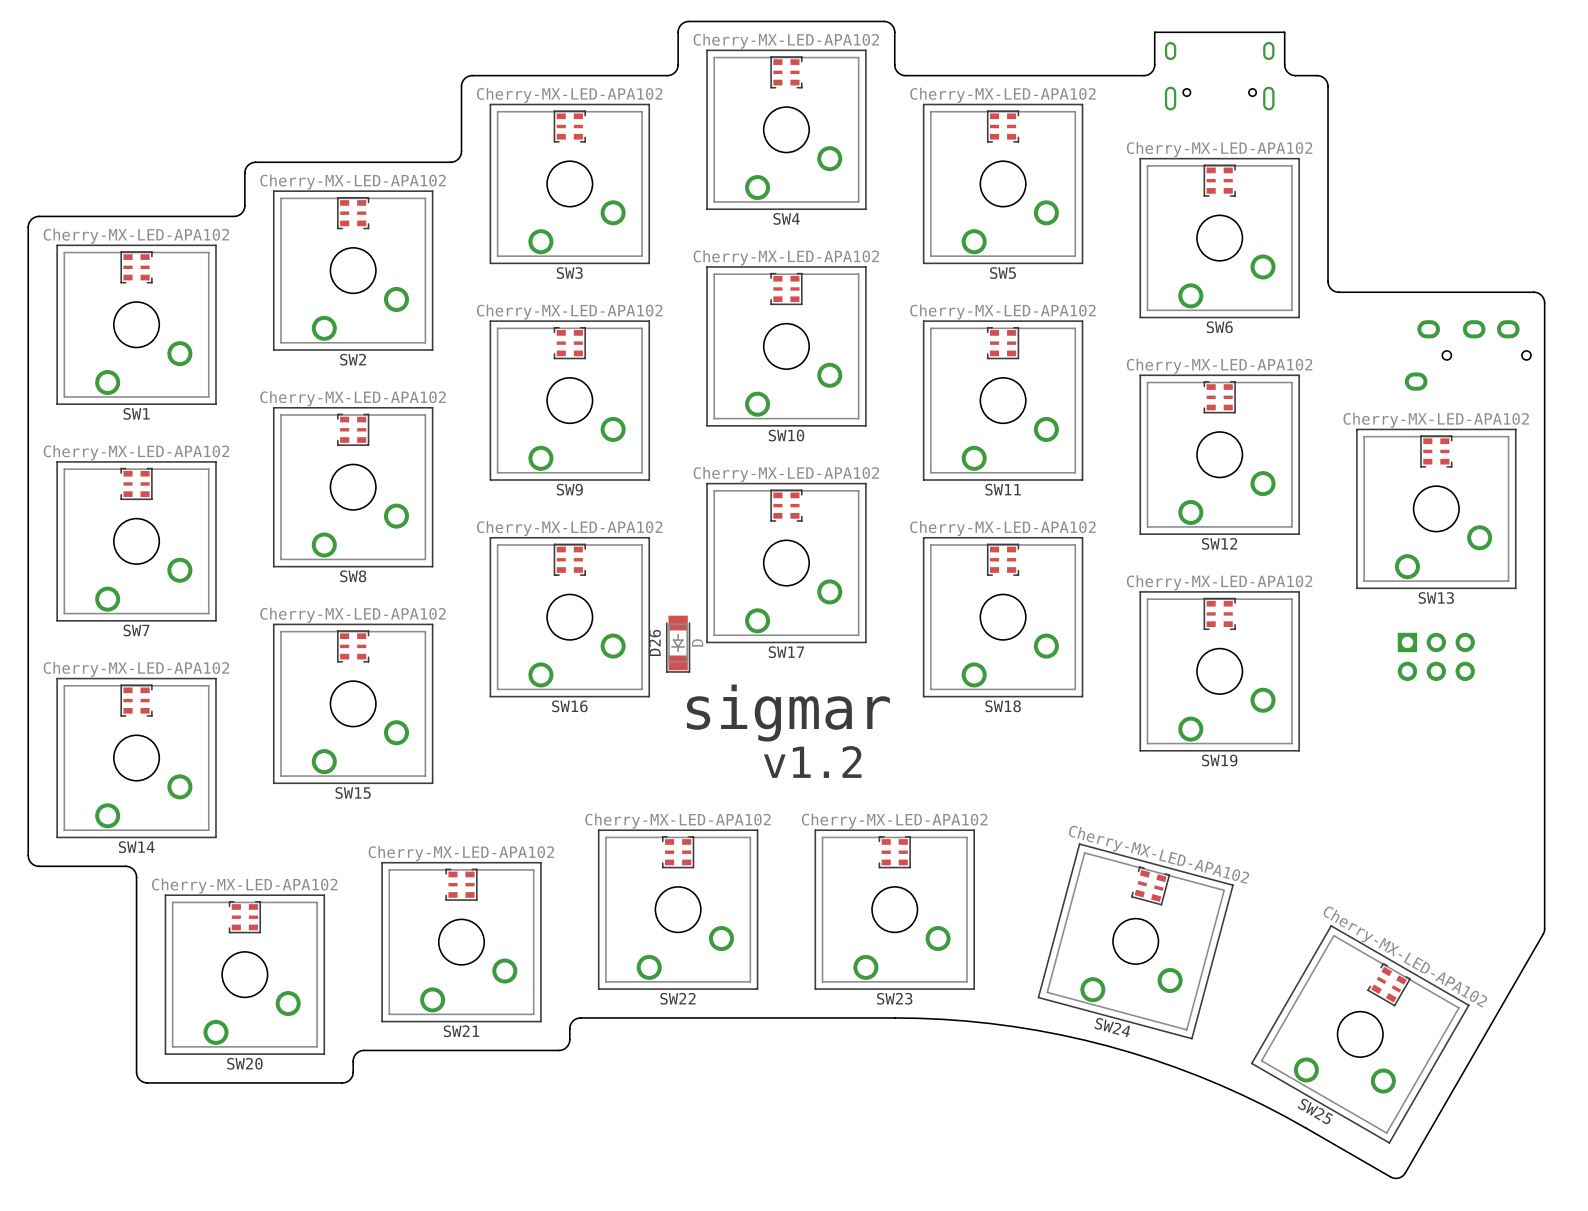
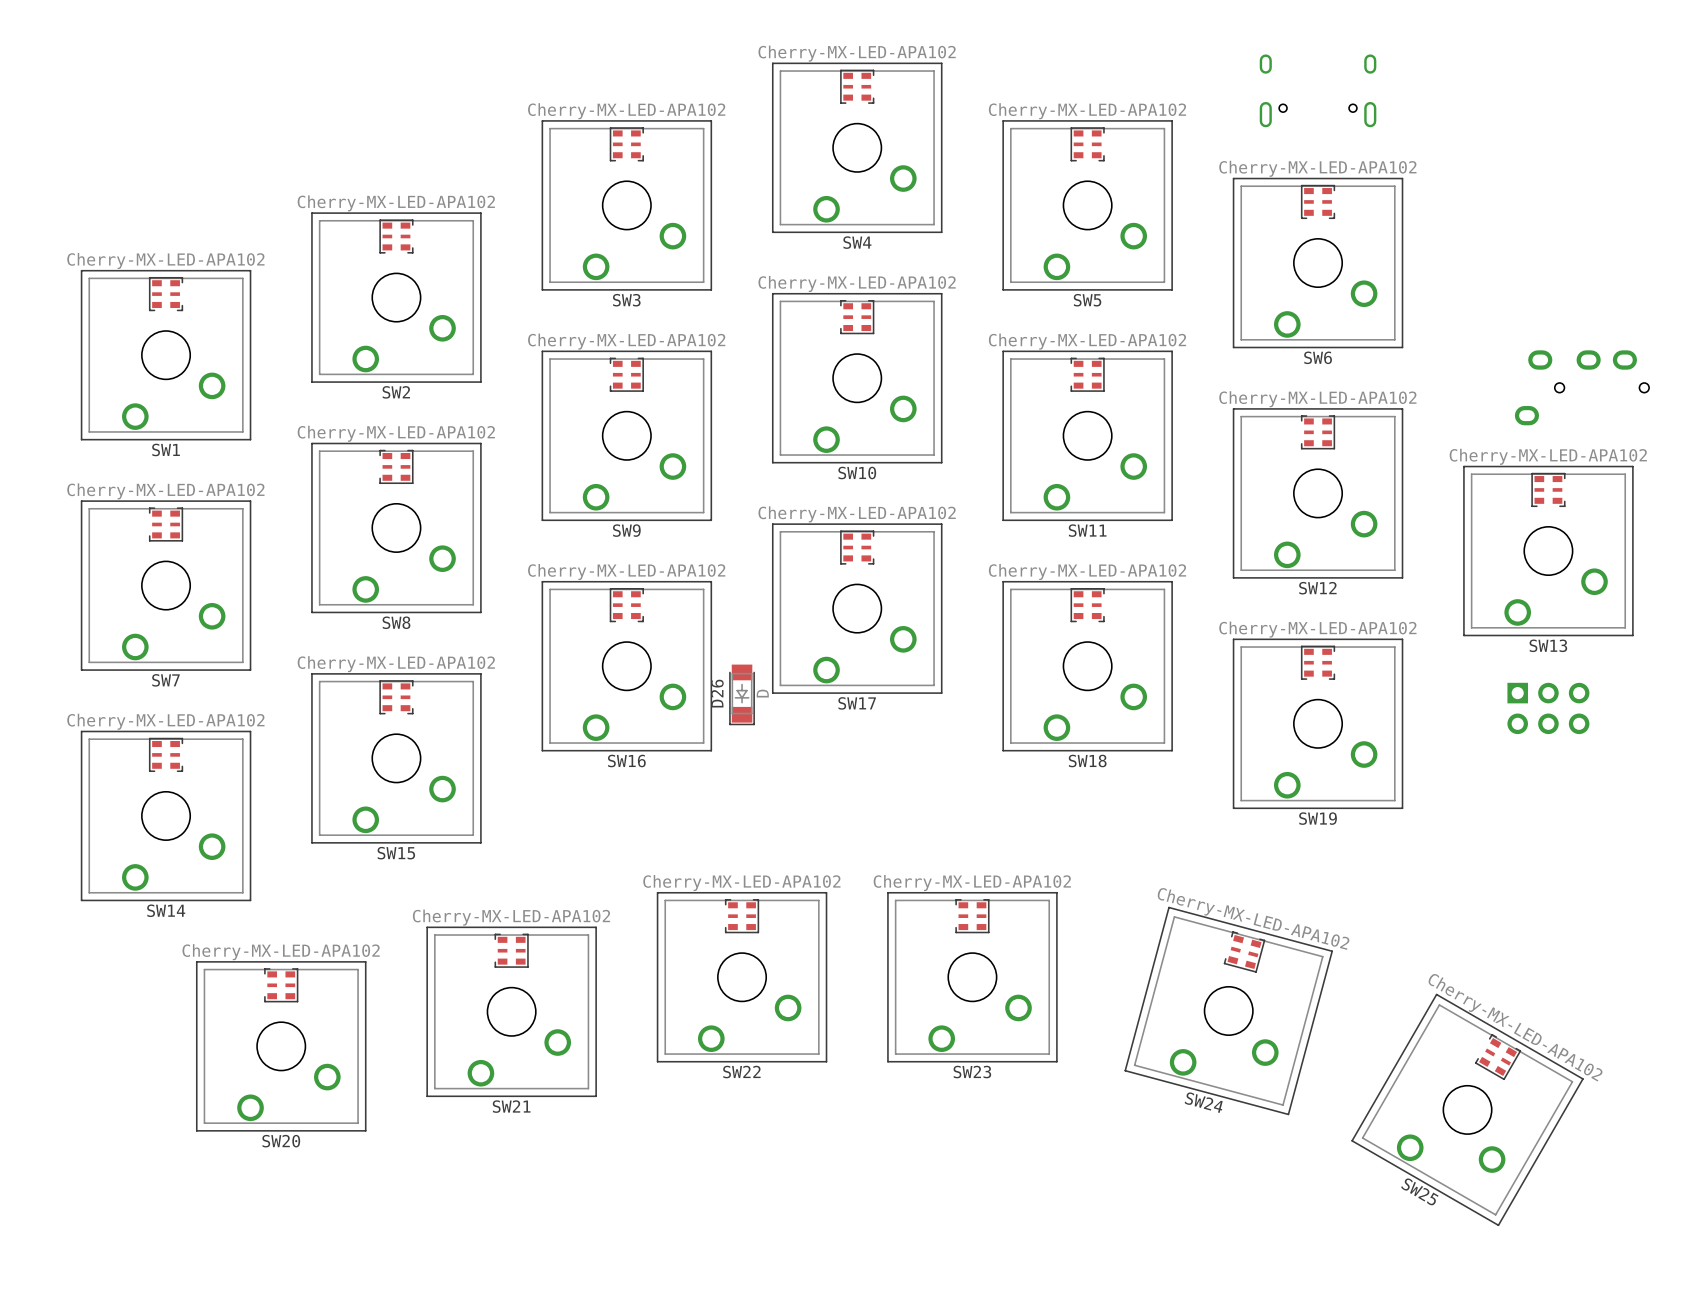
board edge: (688, 21) (886, 21) (892, 25) (894, 30) (895, 68) (900, 74) (905, 75) (1145, 75) (1151, 72) (1154, 67) (1154, 32) (1284, 32) (1284, 64) (1286, 71) (1294, 75) (1319, 75) (1324, 78) (1327, 85) (1328, 281) (1331, 289) (1338, 292) (1533, 292) (1543, 297) (1544, 930) (1401, 1176) (1391, 1177) (1264, 1105) (1176, 1067) (1084, 1040) (1014, 1026) (966, 1021) (894, 1017) (579, 1018) (571, 1023) (568, 1043) (560, 1050) (361, 1050) (354, 1057) (351, 1077) (343, 1082) (147, 1082) (138, 1077) (135, 871) (125, 866) (37, 866) (31, 863) (28, 856) (29, 221) (39, 216) (236, 216) (241, 213) (244, 207) (245, 170) (249, 164) (254, 162) (453, 161) (458, 159) (461, 152) (461, 85) (466, 77) (670, 75) (674, 72) (678, 66) (678, 28) (683, 22) (688, 21) -> none
text: sigmar (788, 713) -> none
text: v1.2 (812, 761) -> none

